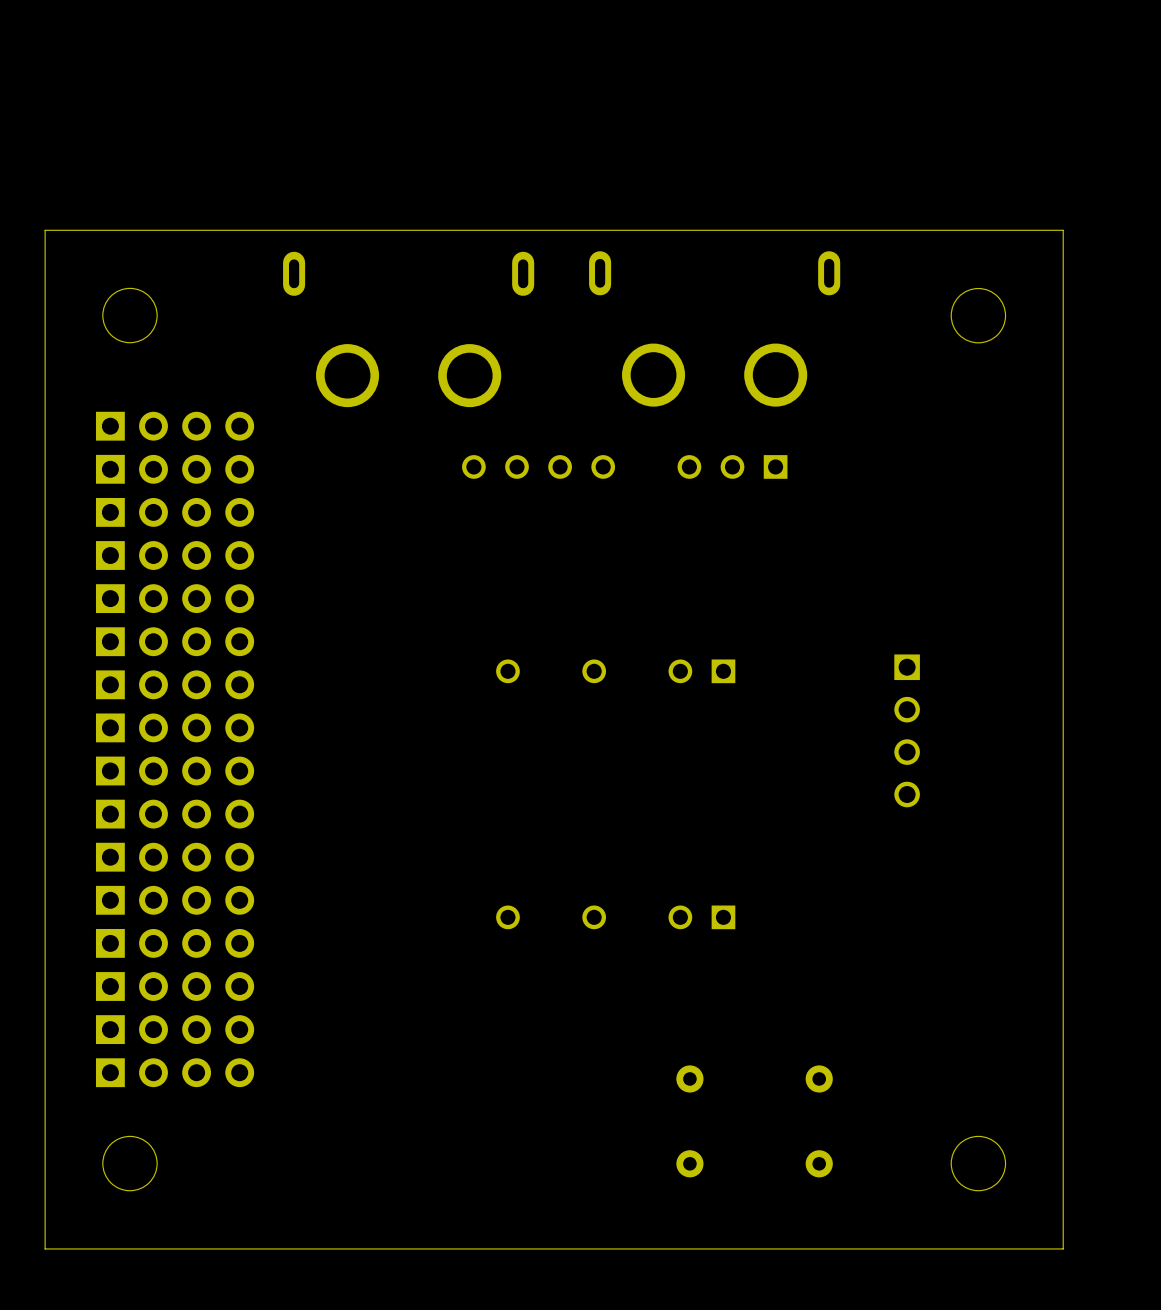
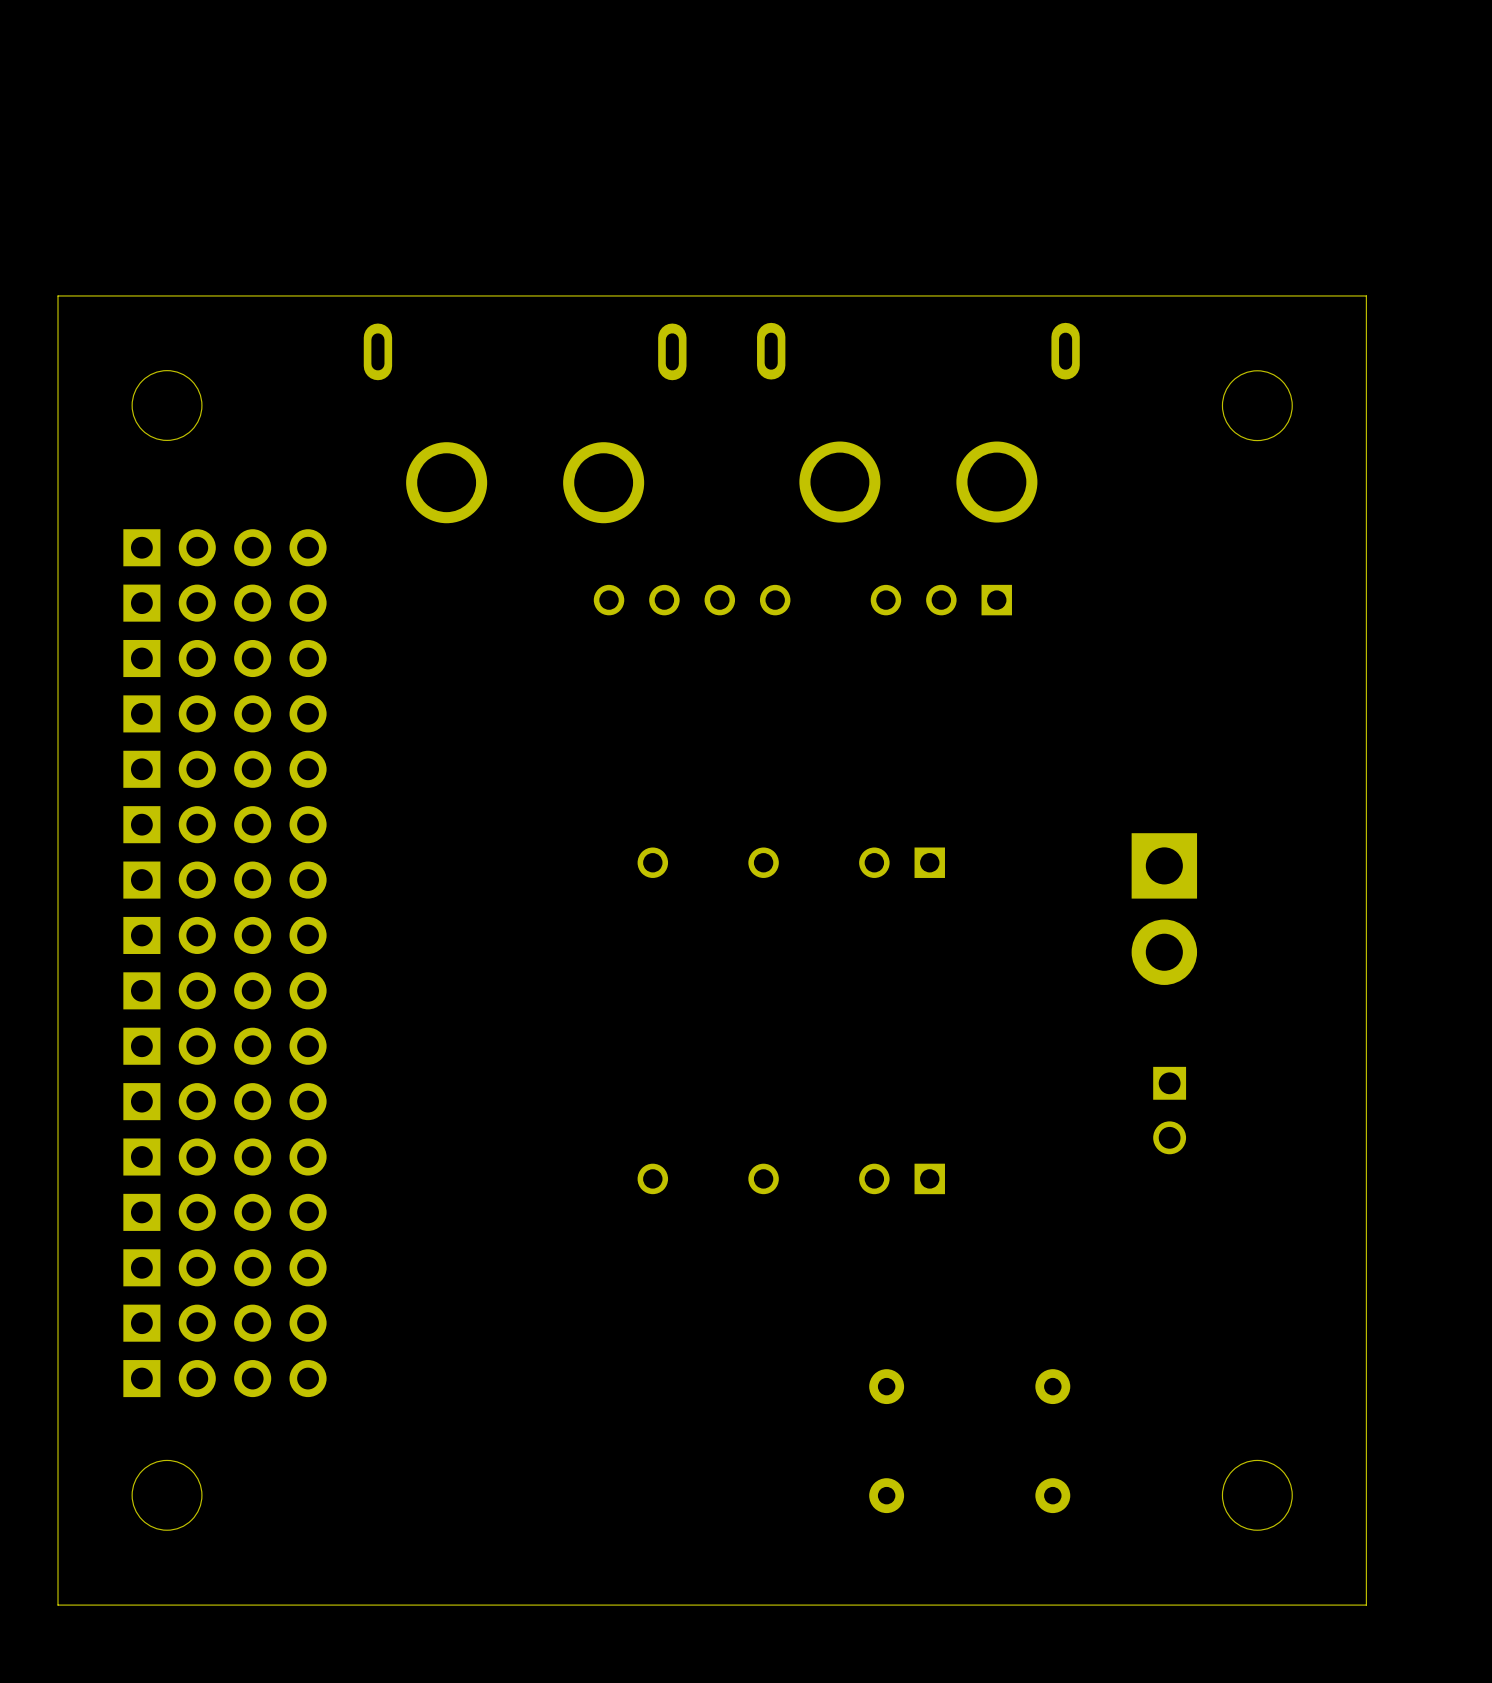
part: none -> (1164, 909)
part: (907, 730) -> none
part: none -> (1169, 1110)

